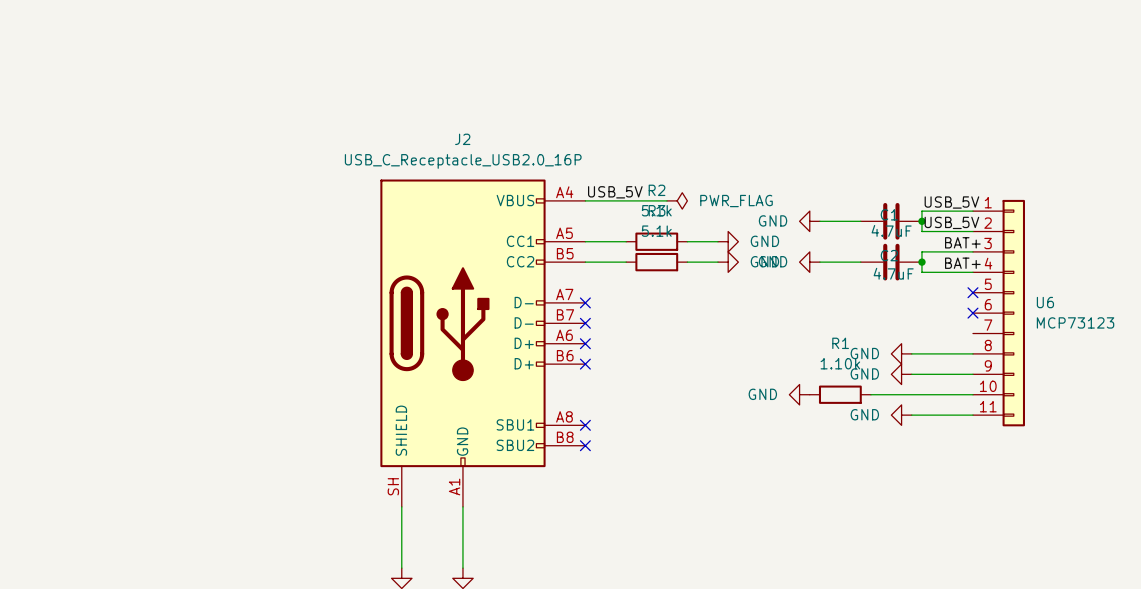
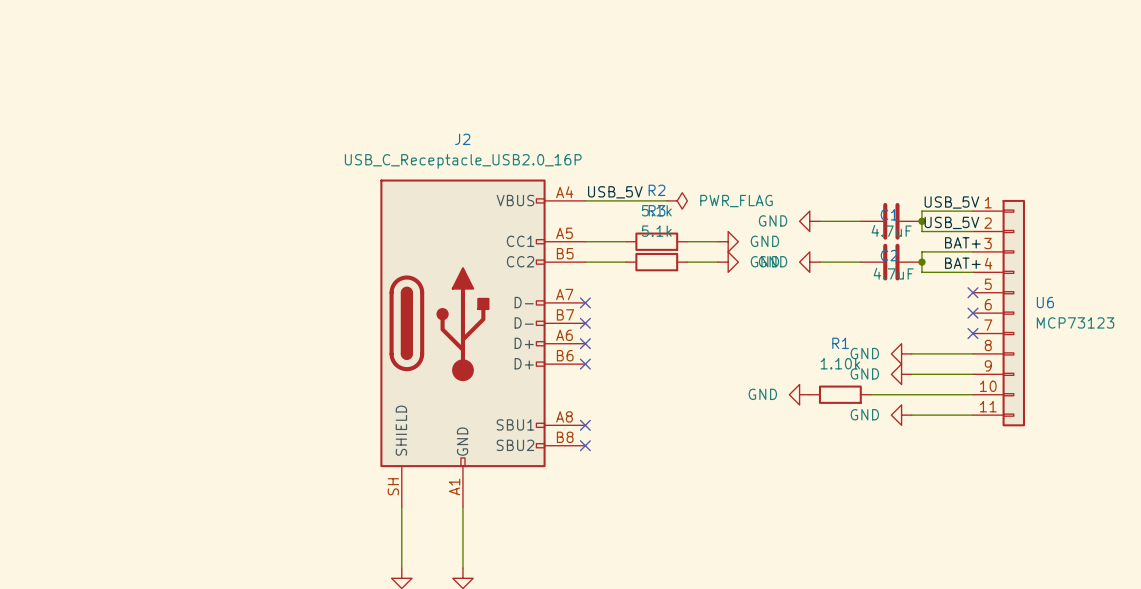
no-connect mark: none -> (972, 333)

